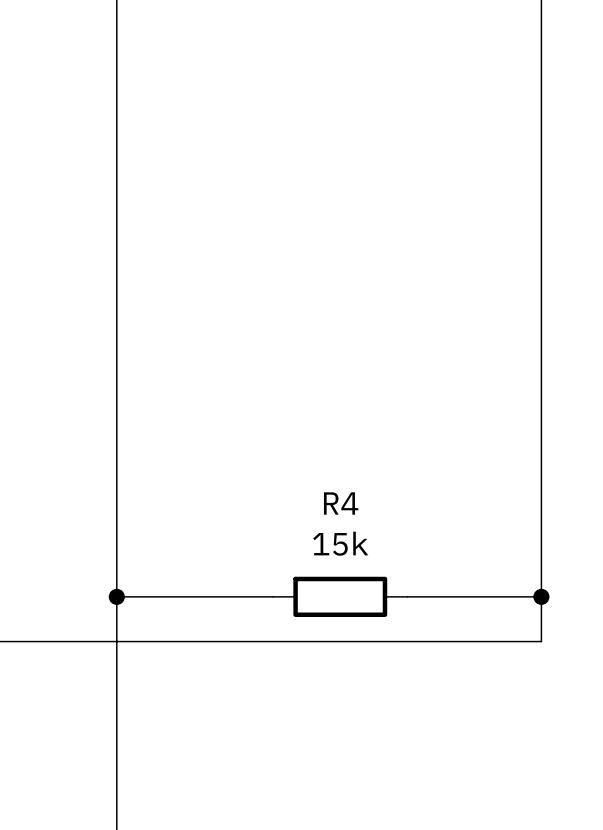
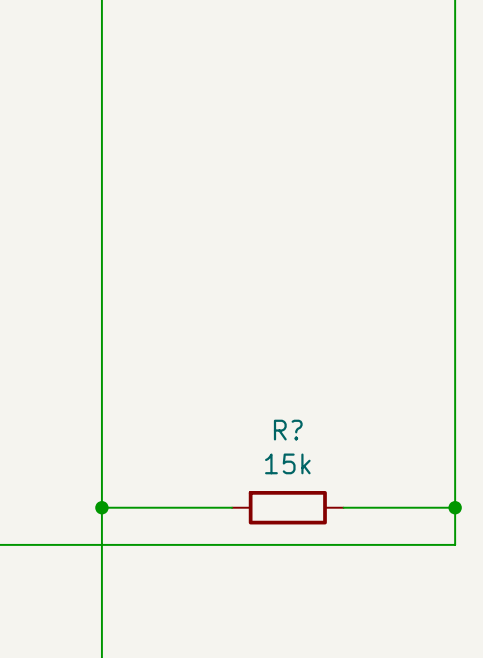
R4 name: R4 (341, 503) -> R? (288, 430)

